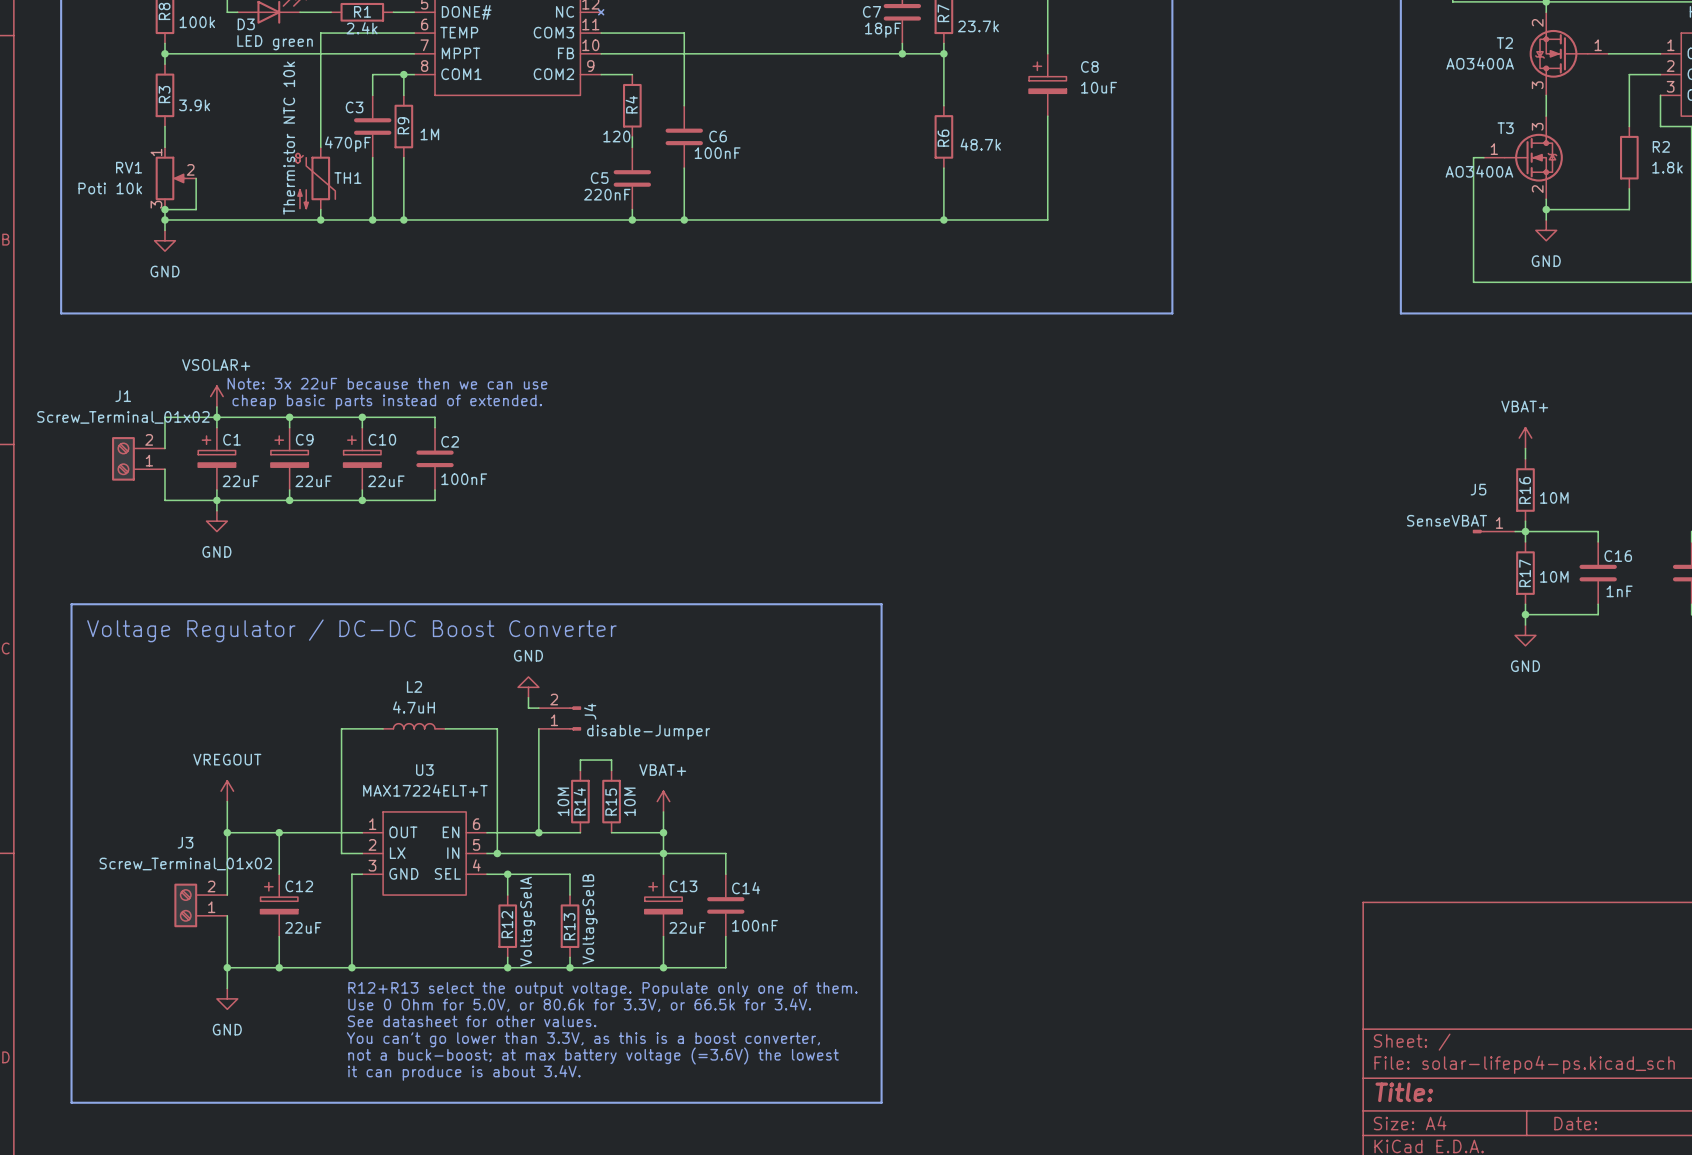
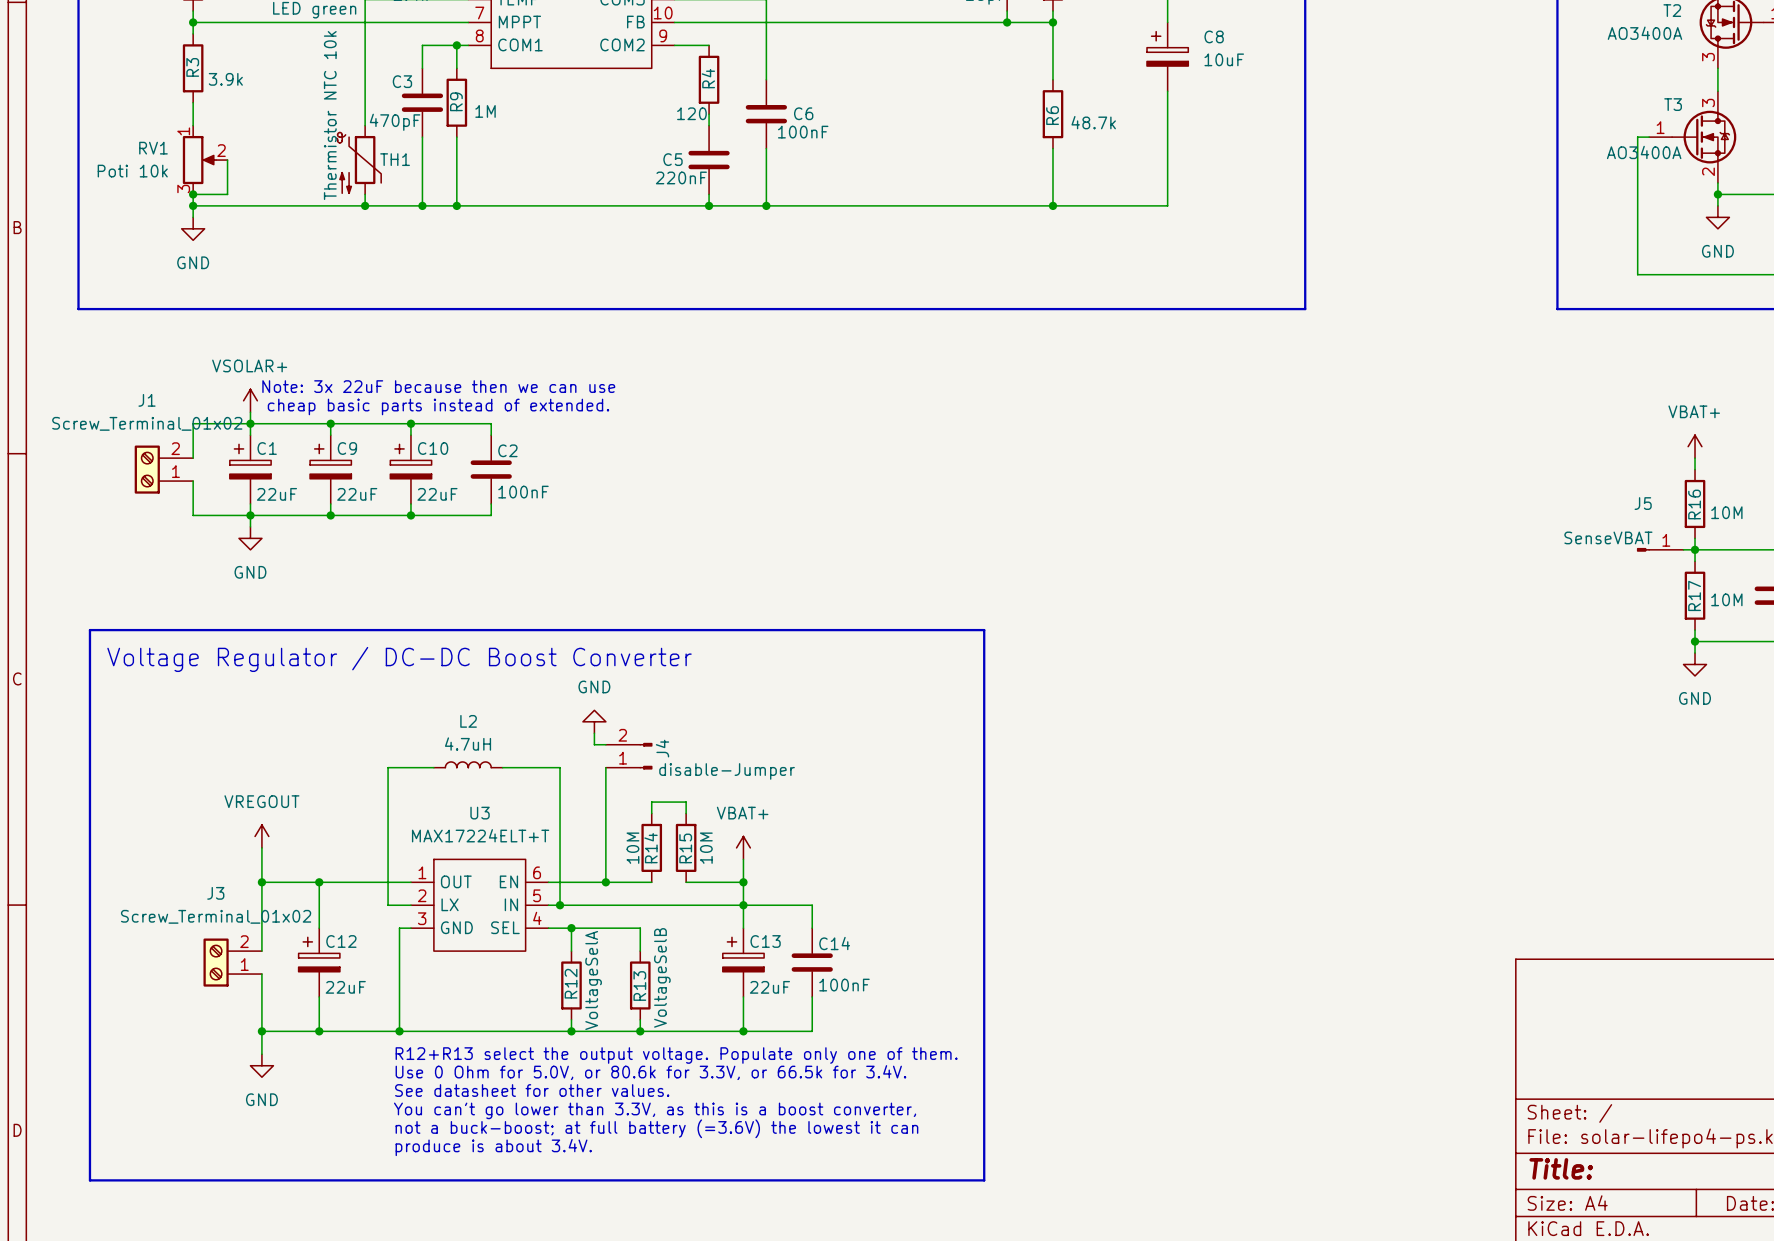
text: not a buck-boost; at max battery voltage (=3.6V) the lowest (593, 1056) -> not a buck-boost; at full battery (=3.6V) the lowest it can (656, 1128)
text: it can produce is about 3.4V. (464, 1072) -> produce is about 3.4V. (493, 1147)

